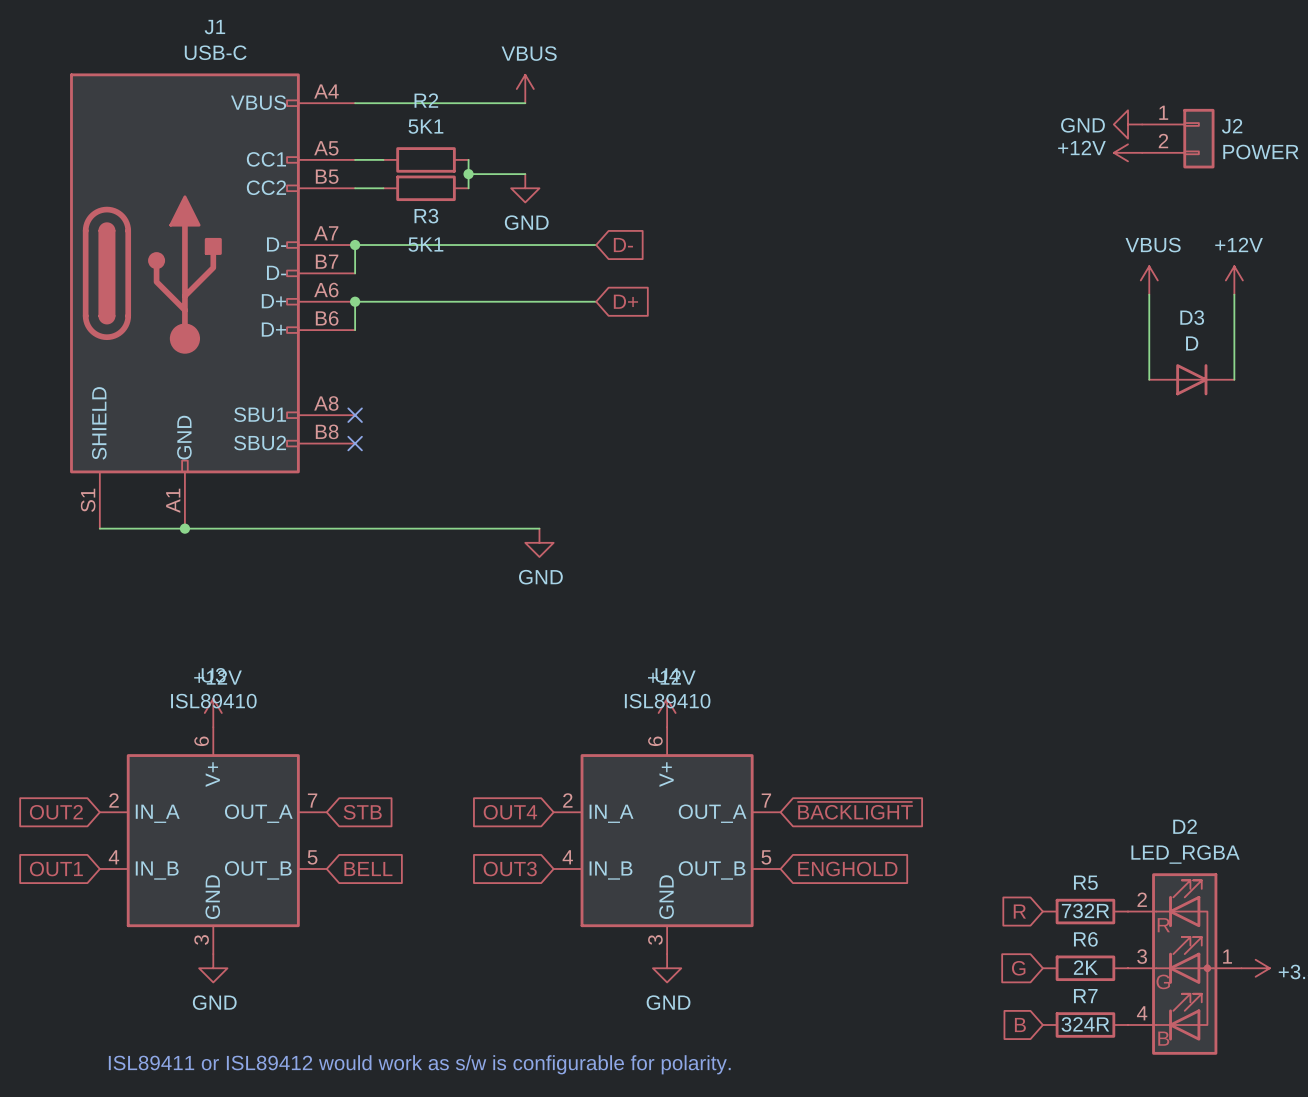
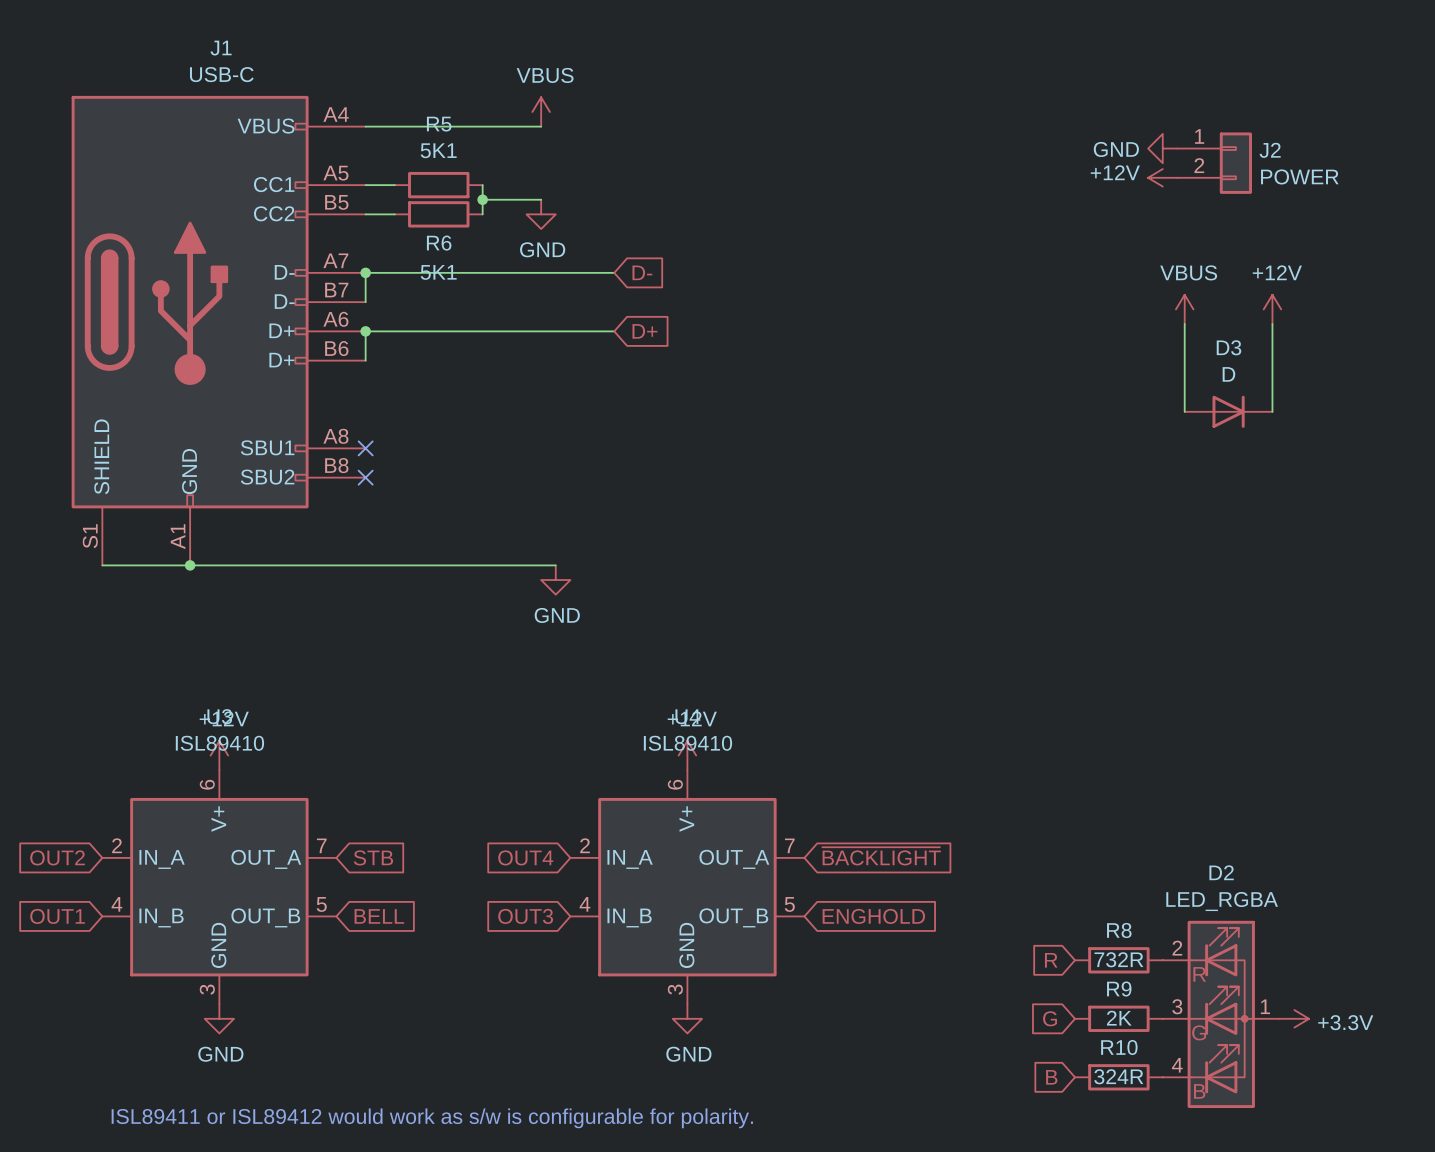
R2 name: R2 (426, 100) -> R5 (439, 124)
R3 name: R3 (426, 216) -> R6 (439, 243)
R5 name: R5 (1085, 882) -> R8 (1119, 930)
R6 name: R6 (1085, 939) -> R9 (1119, 989)
R7 name: R7 (1085, 996) -> R10 (1119, 1047)

